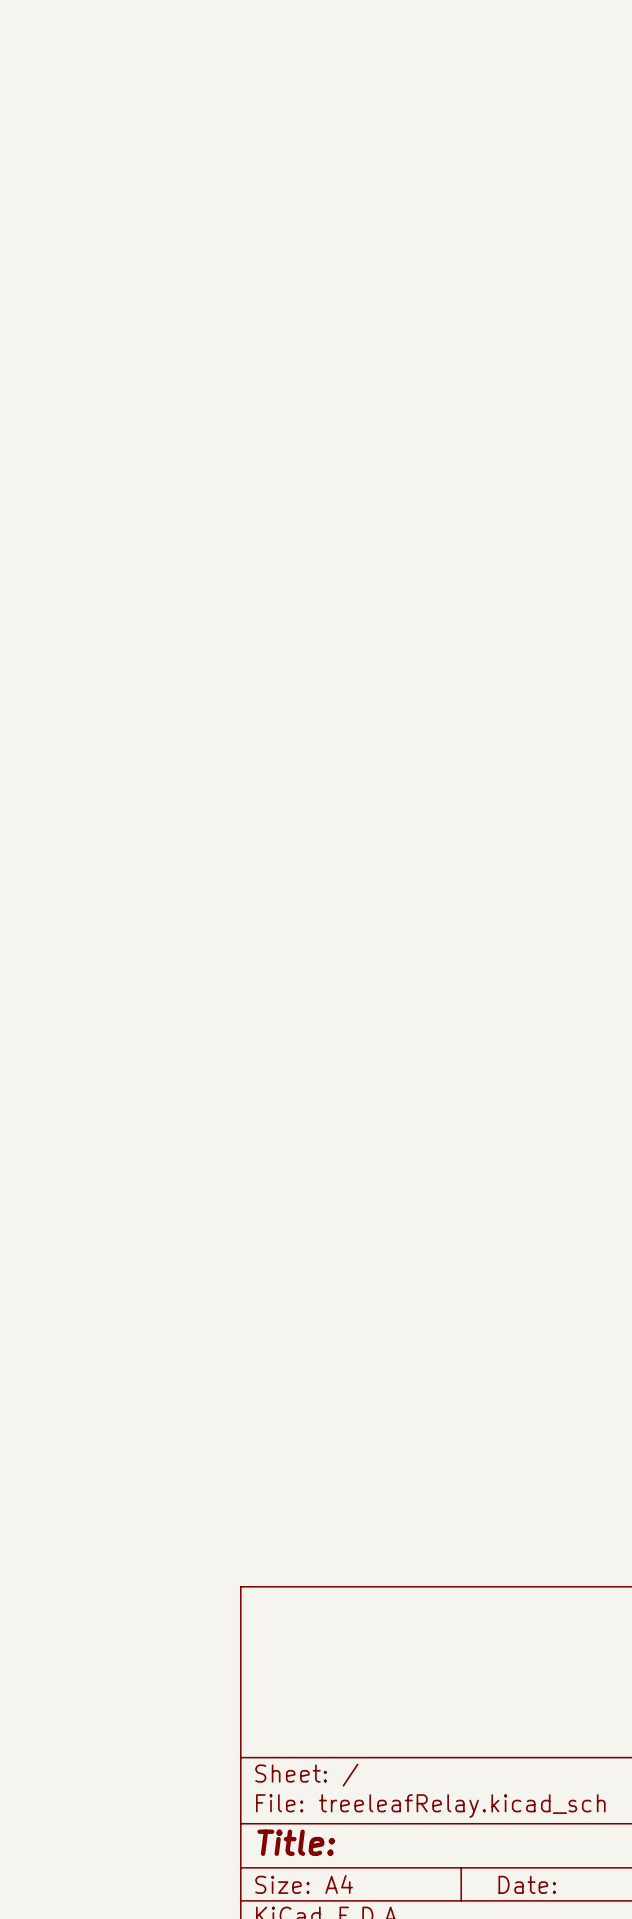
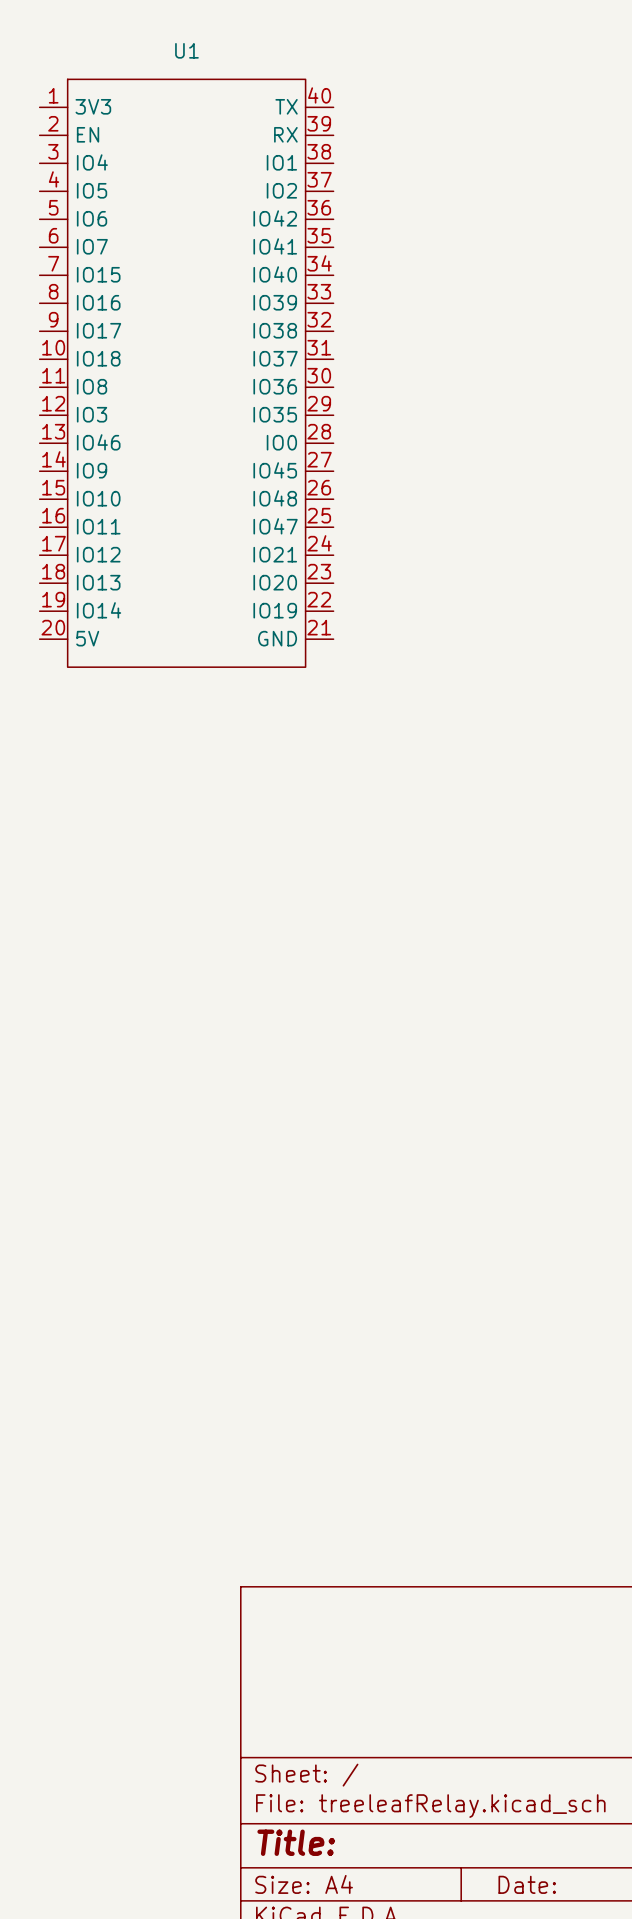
U1: none -> (186, 373)

